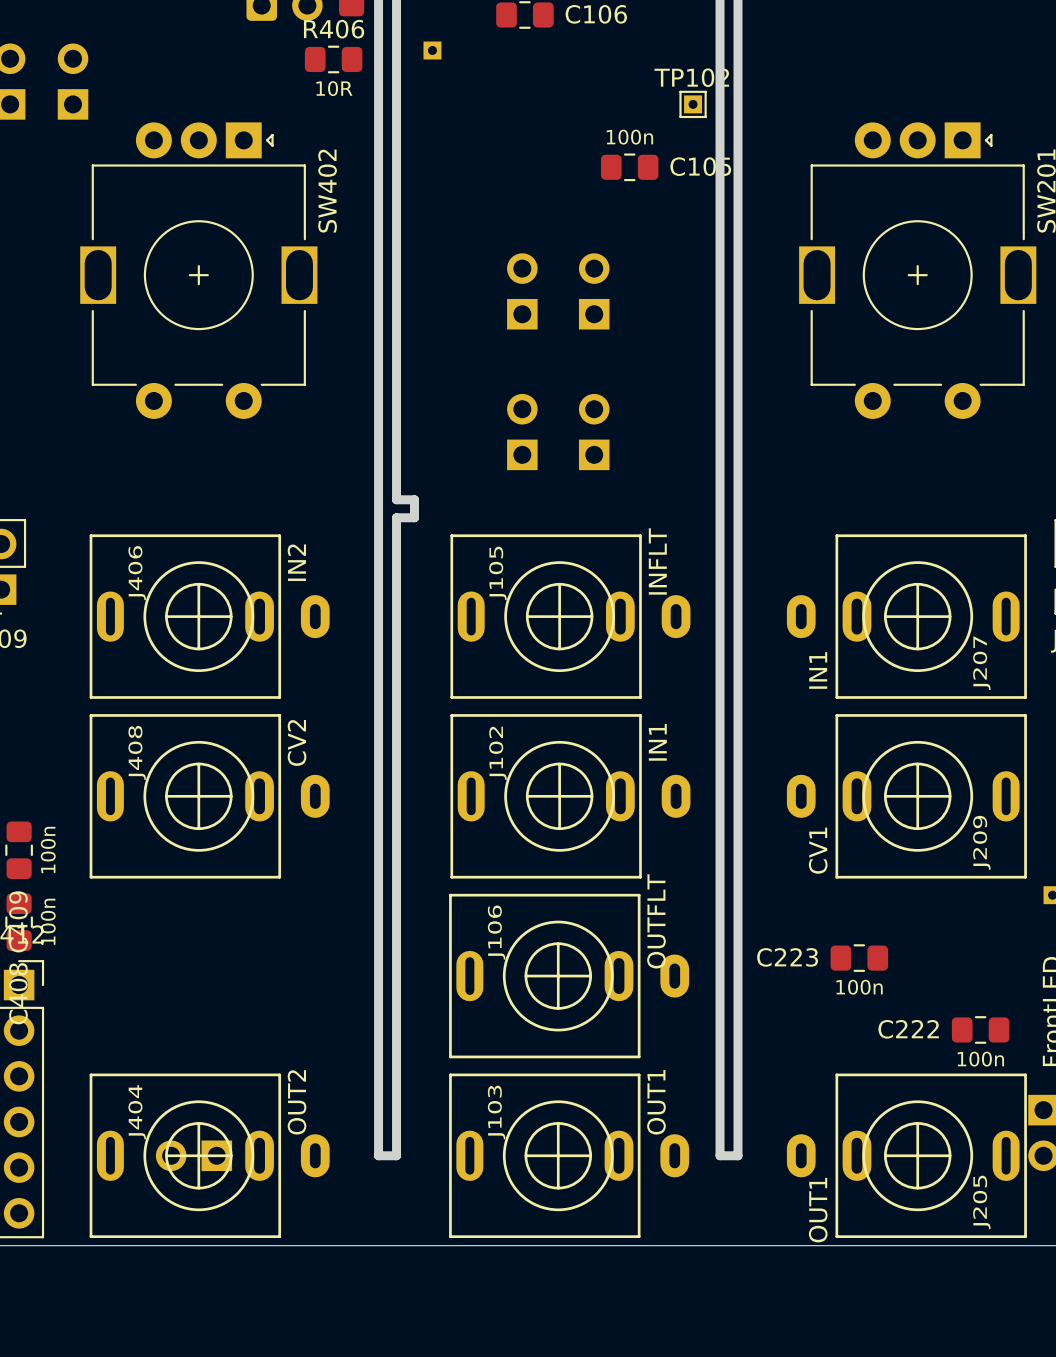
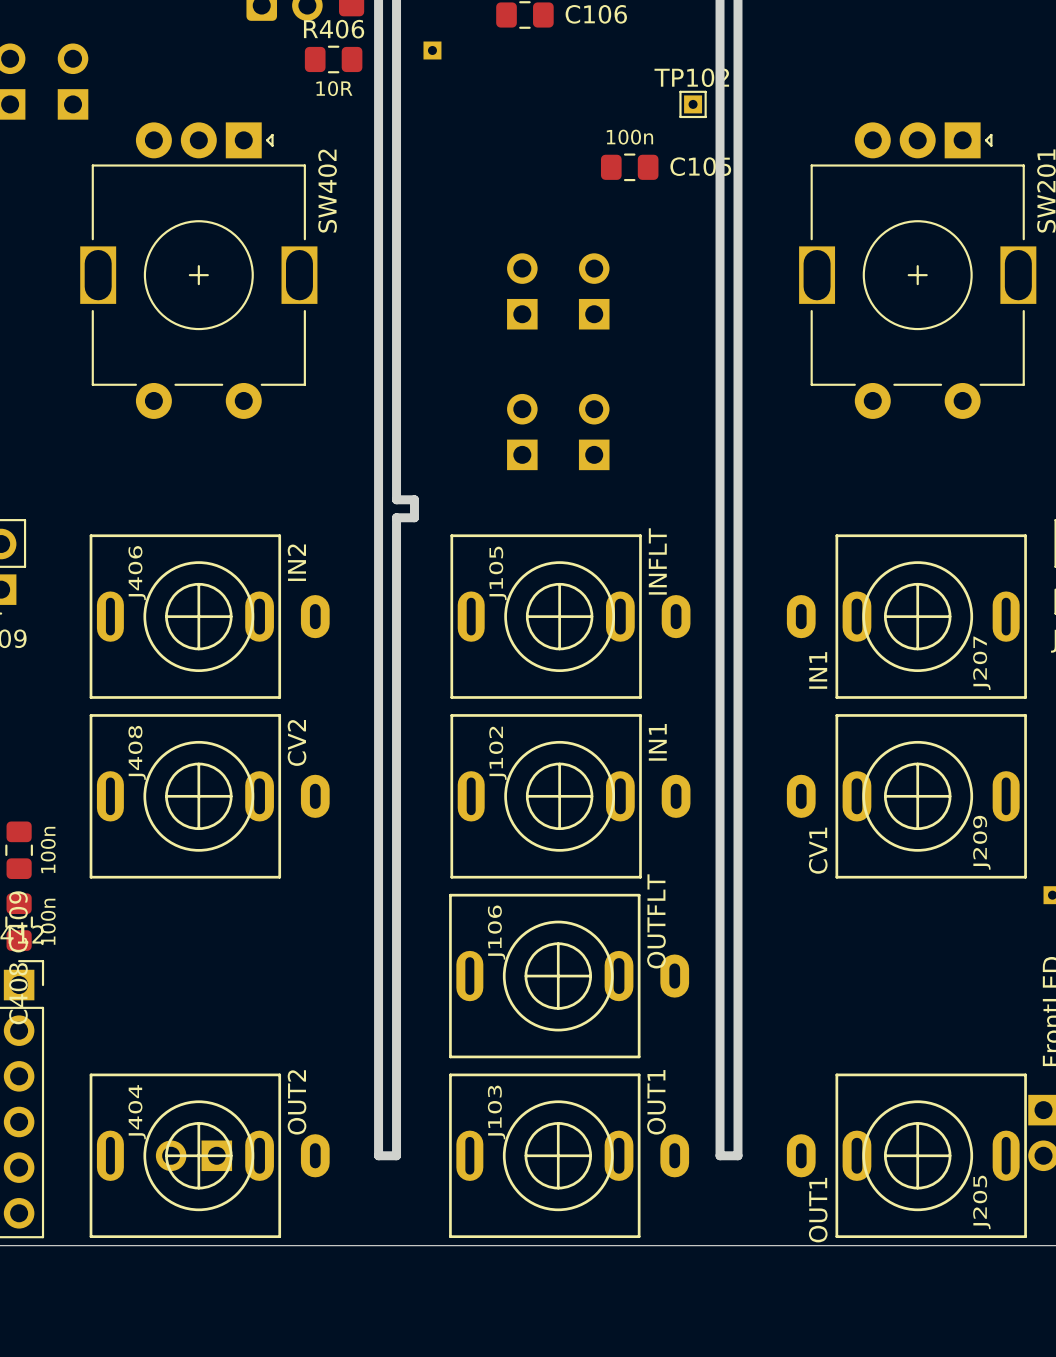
C223: 100n (859, 958) -> none
C222: 100n (980, 1029) -> none

